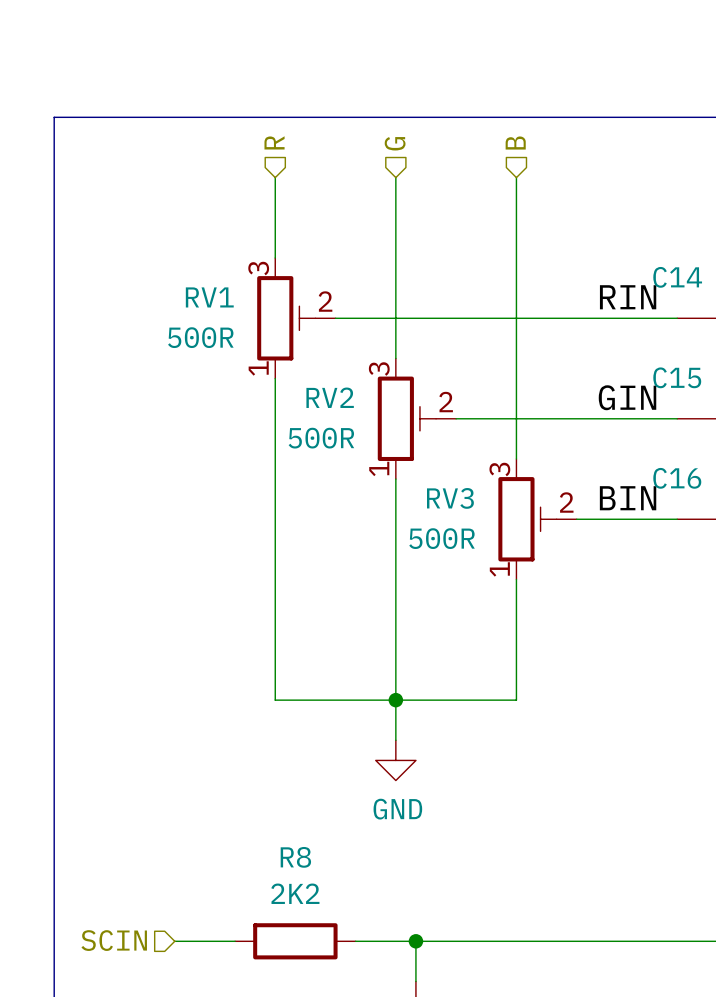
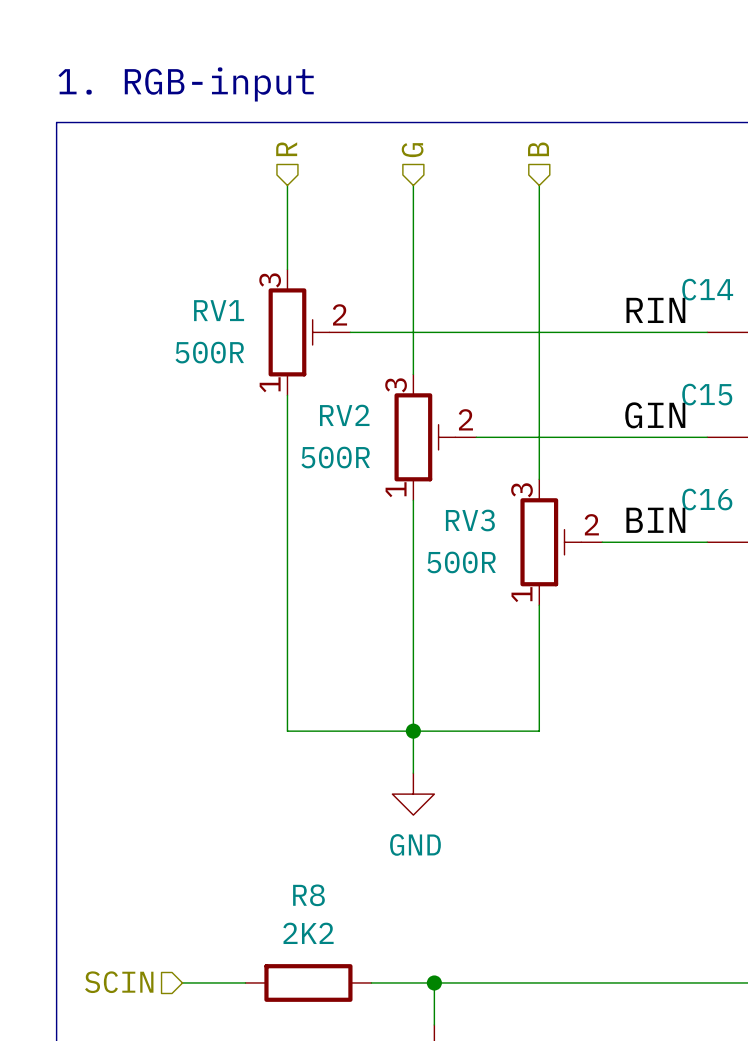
text: none -> 1. RGB-input (186, 84)

